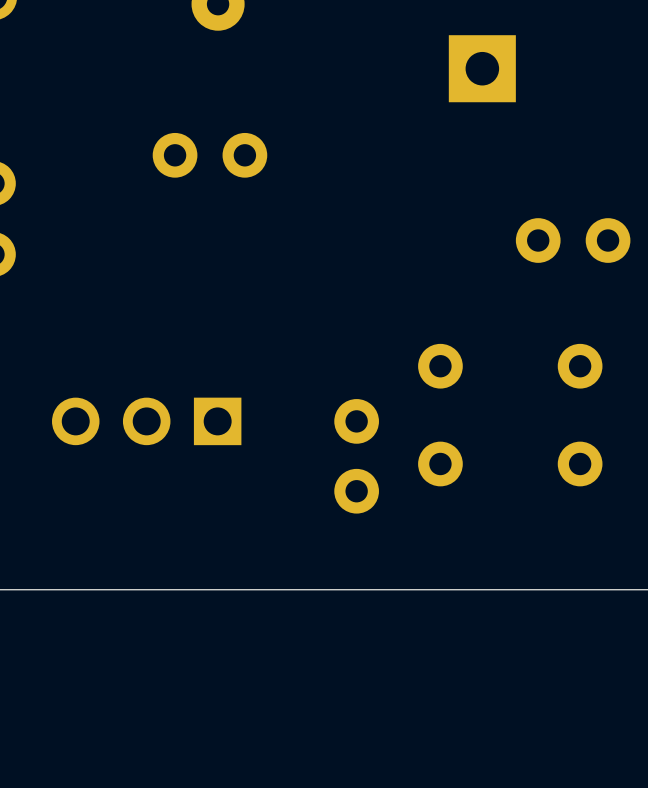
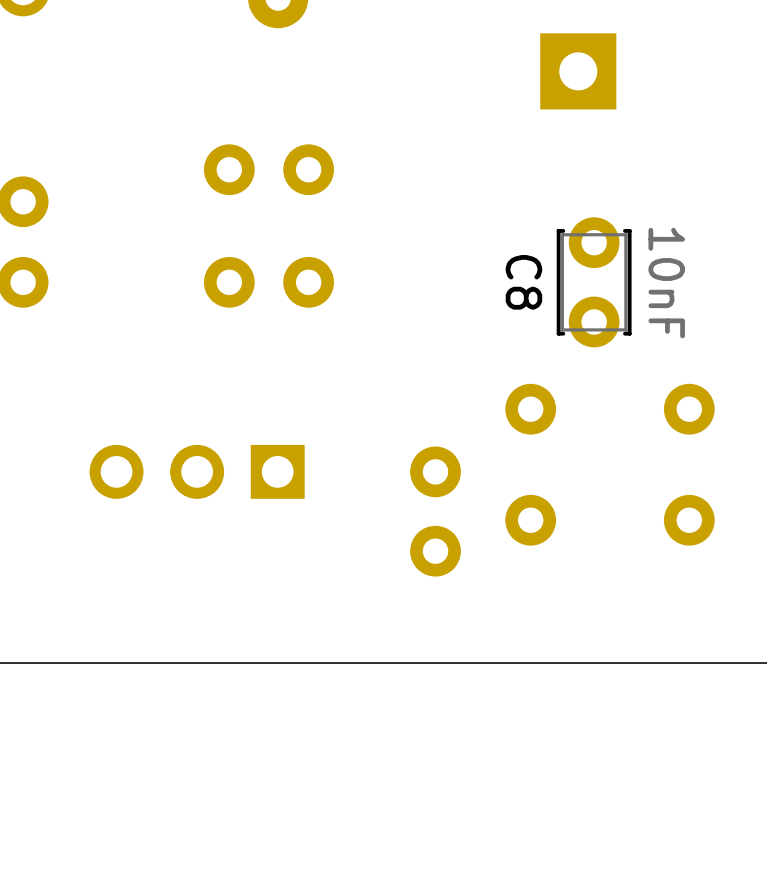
C8 side: top (573, 240) -> bottom (594, 282)
part: none -> (268, 282)

